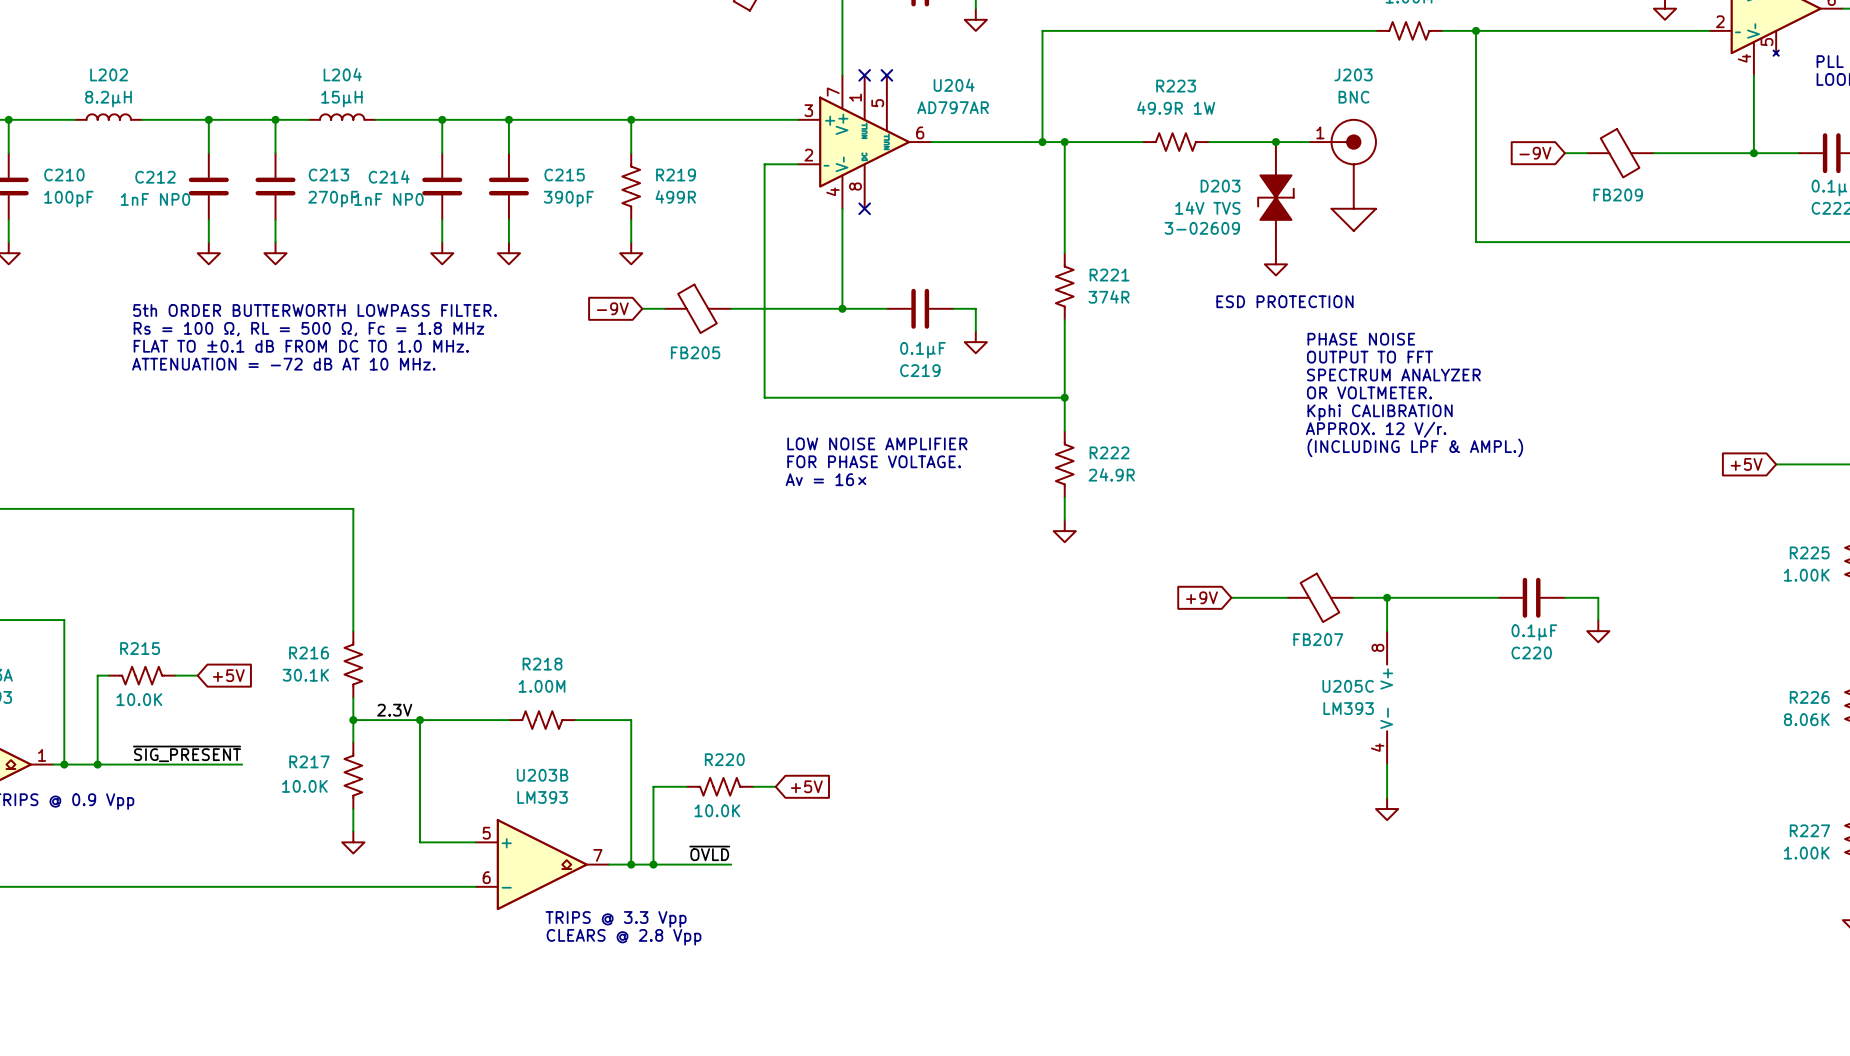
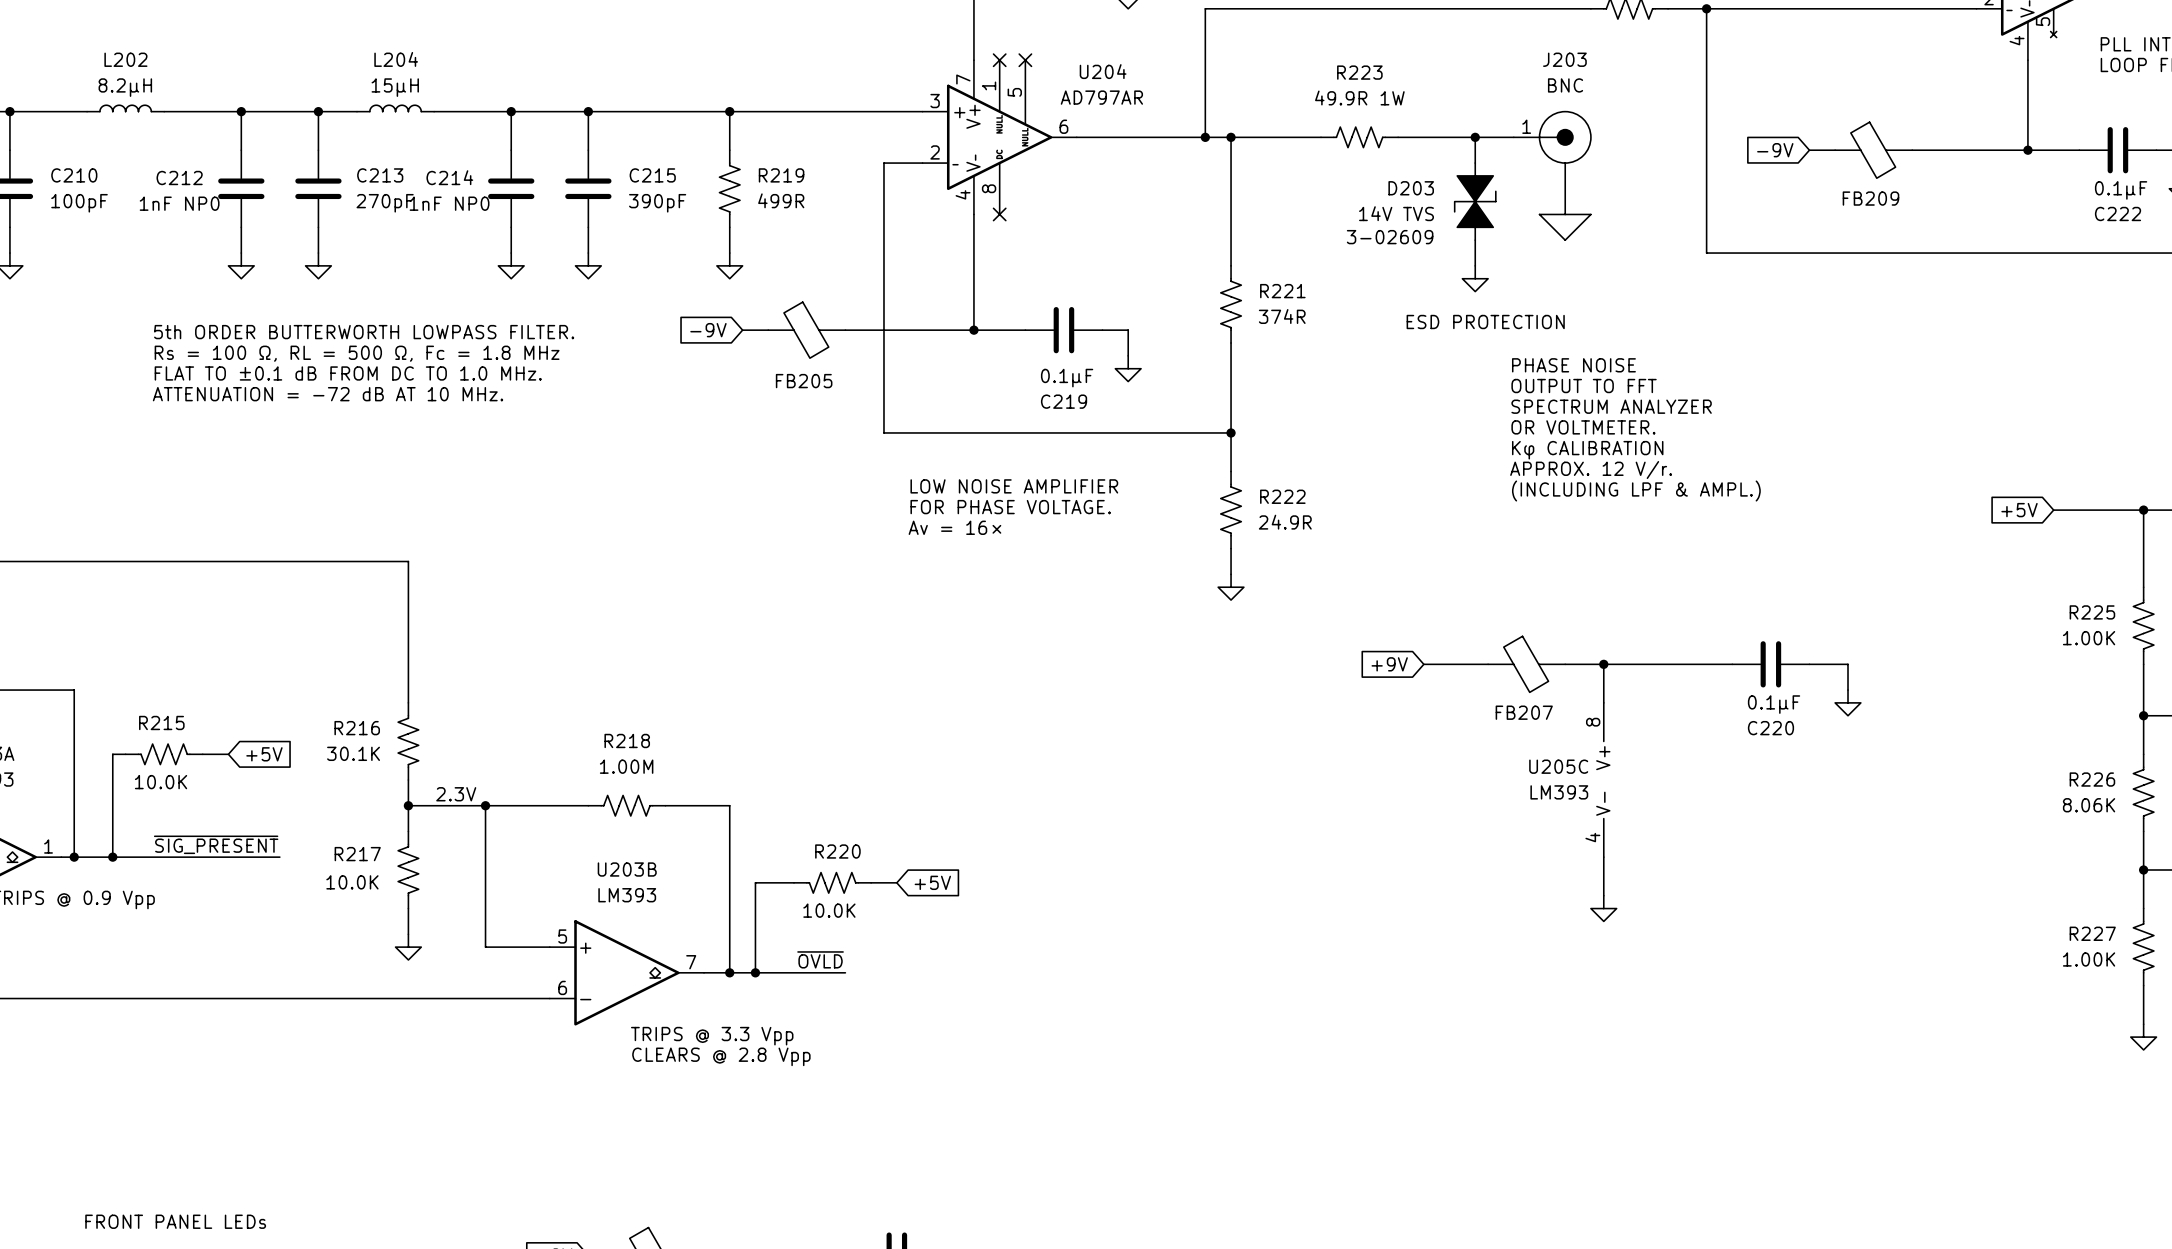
text: Kphi CALIBRATION (1380, 412) -> Kφ CALIBRATION (1587, 450)

